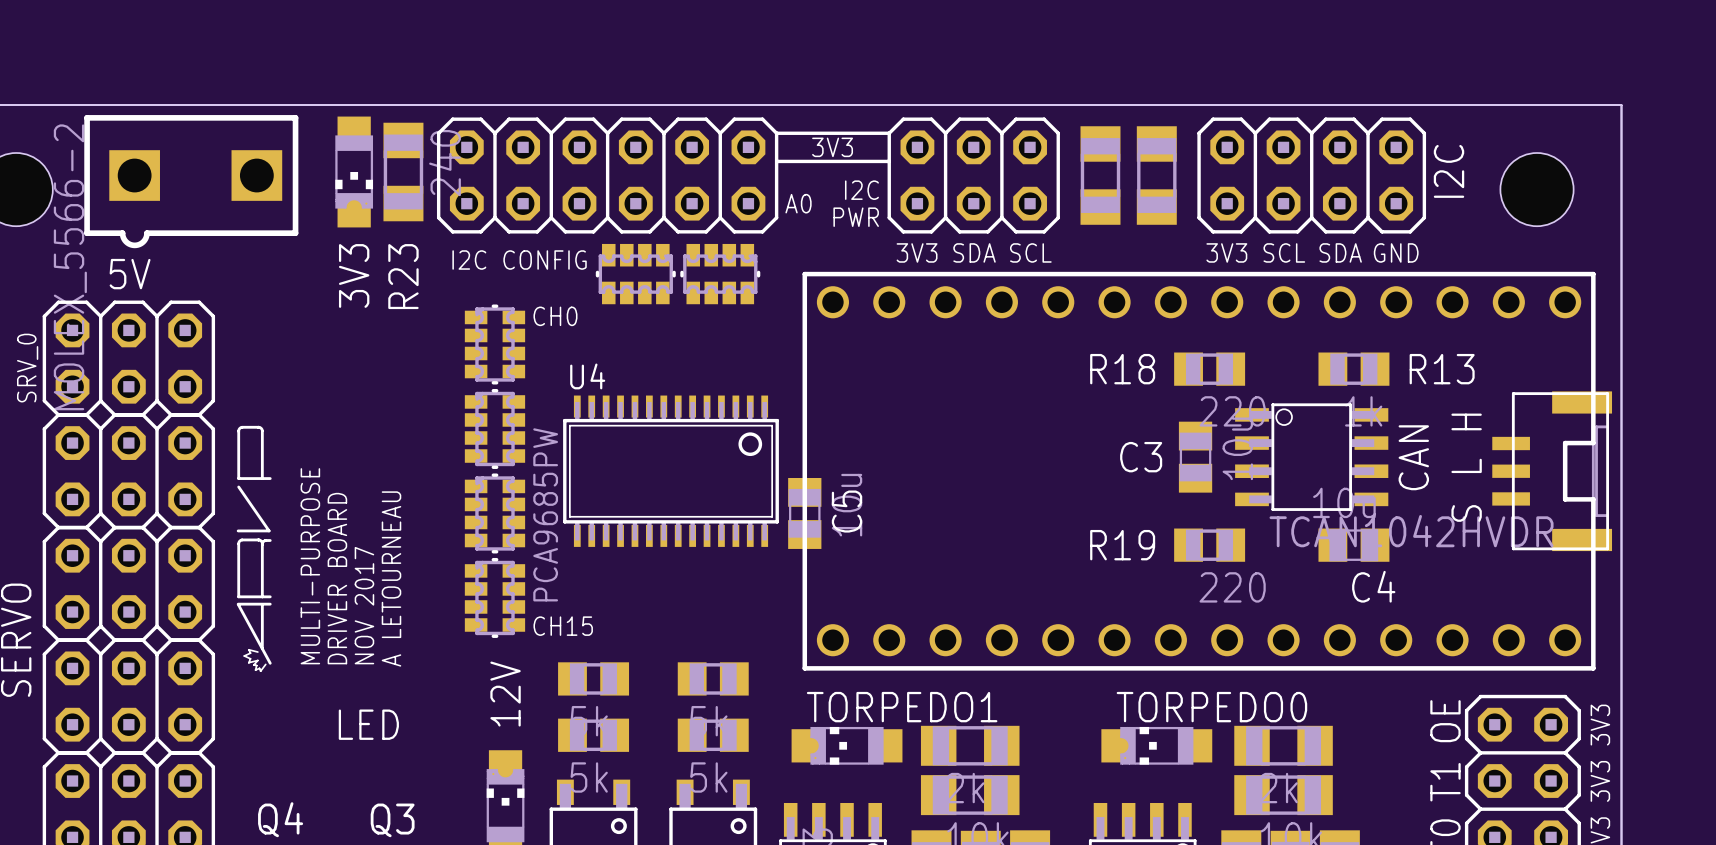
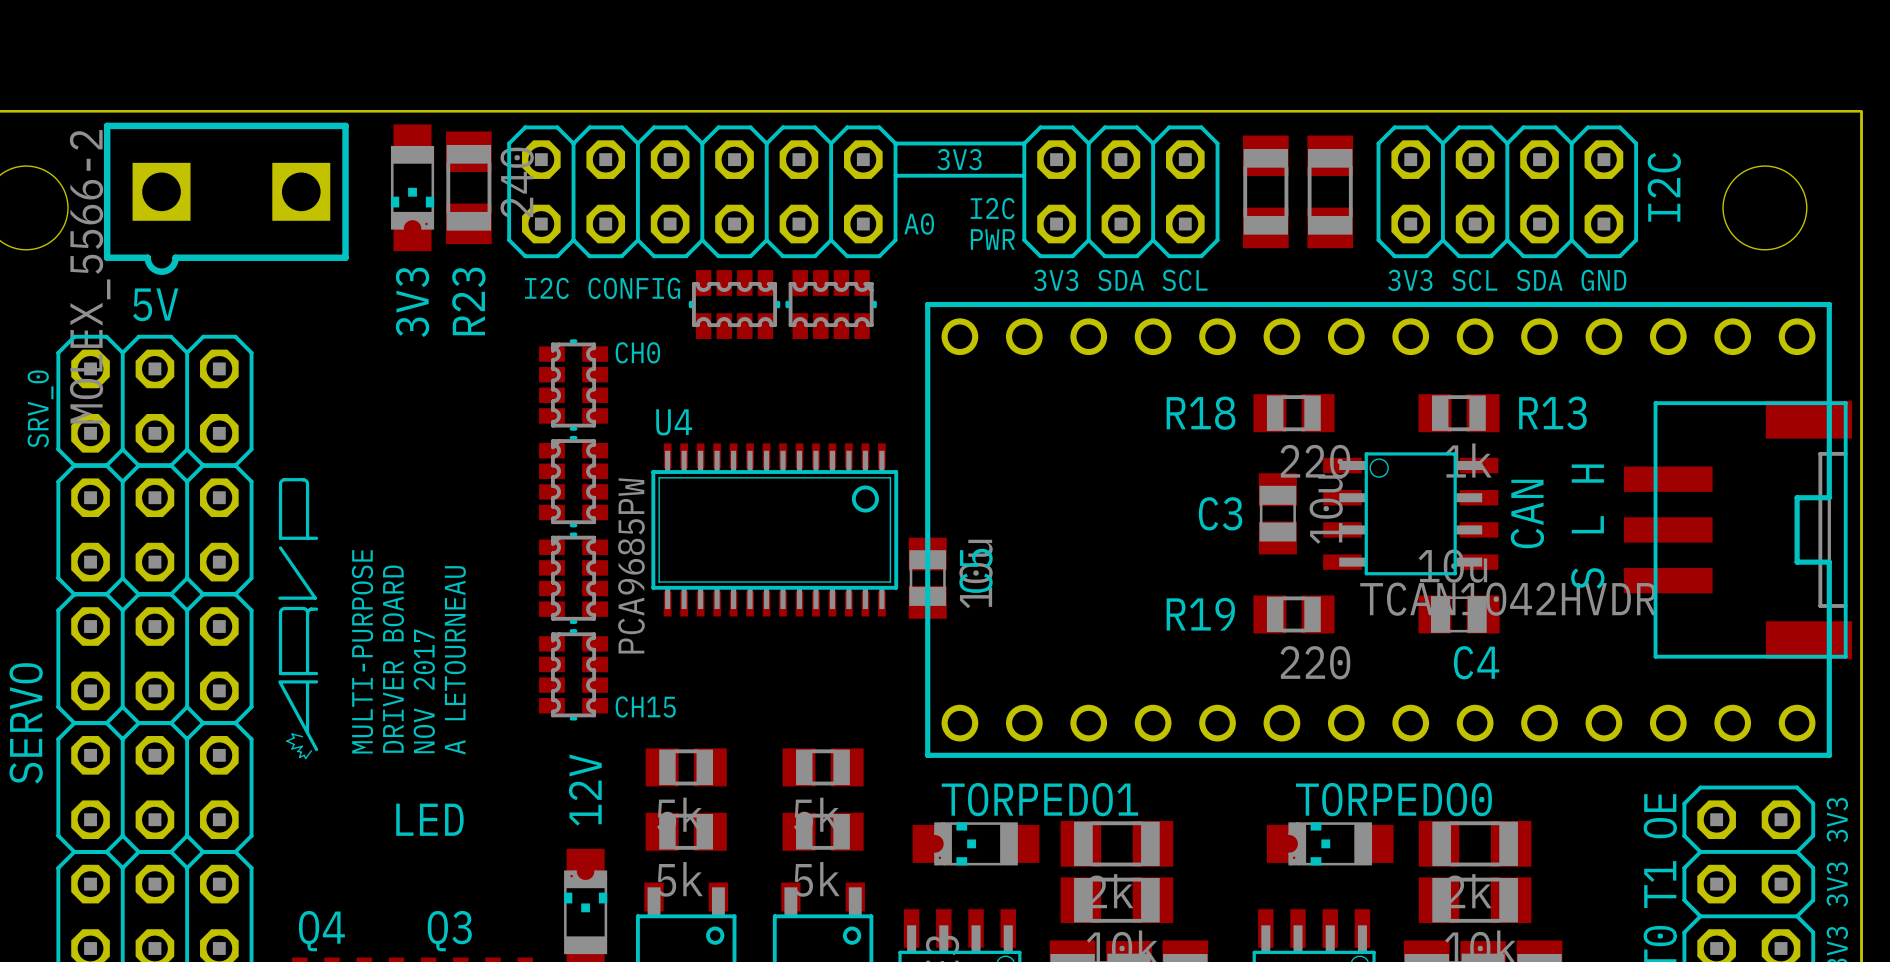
R18 position: (1209, 369) -> (1293, 413)
R13 position: (1353, 369) -> (1459, 413)
text position: H (1466, 421) -> H (1587, 473)
C3 position: (1195, 457) -> (1277, 513)
part position: (1311, 457) -> (1410, 513)
text position: CAN (1413, 457) -> CAN (1527, 514)
text position: L (1466, 465) -> L (1587, 524)
part: none -> (1737, 529)
part: (1552, 471) -> none
text position: S (1466, 513) -> S (1587, 578)
R19 position: (1209, 545) -> (1293, 614)
C4 position: (1353, 545) -> (1459, 614)

